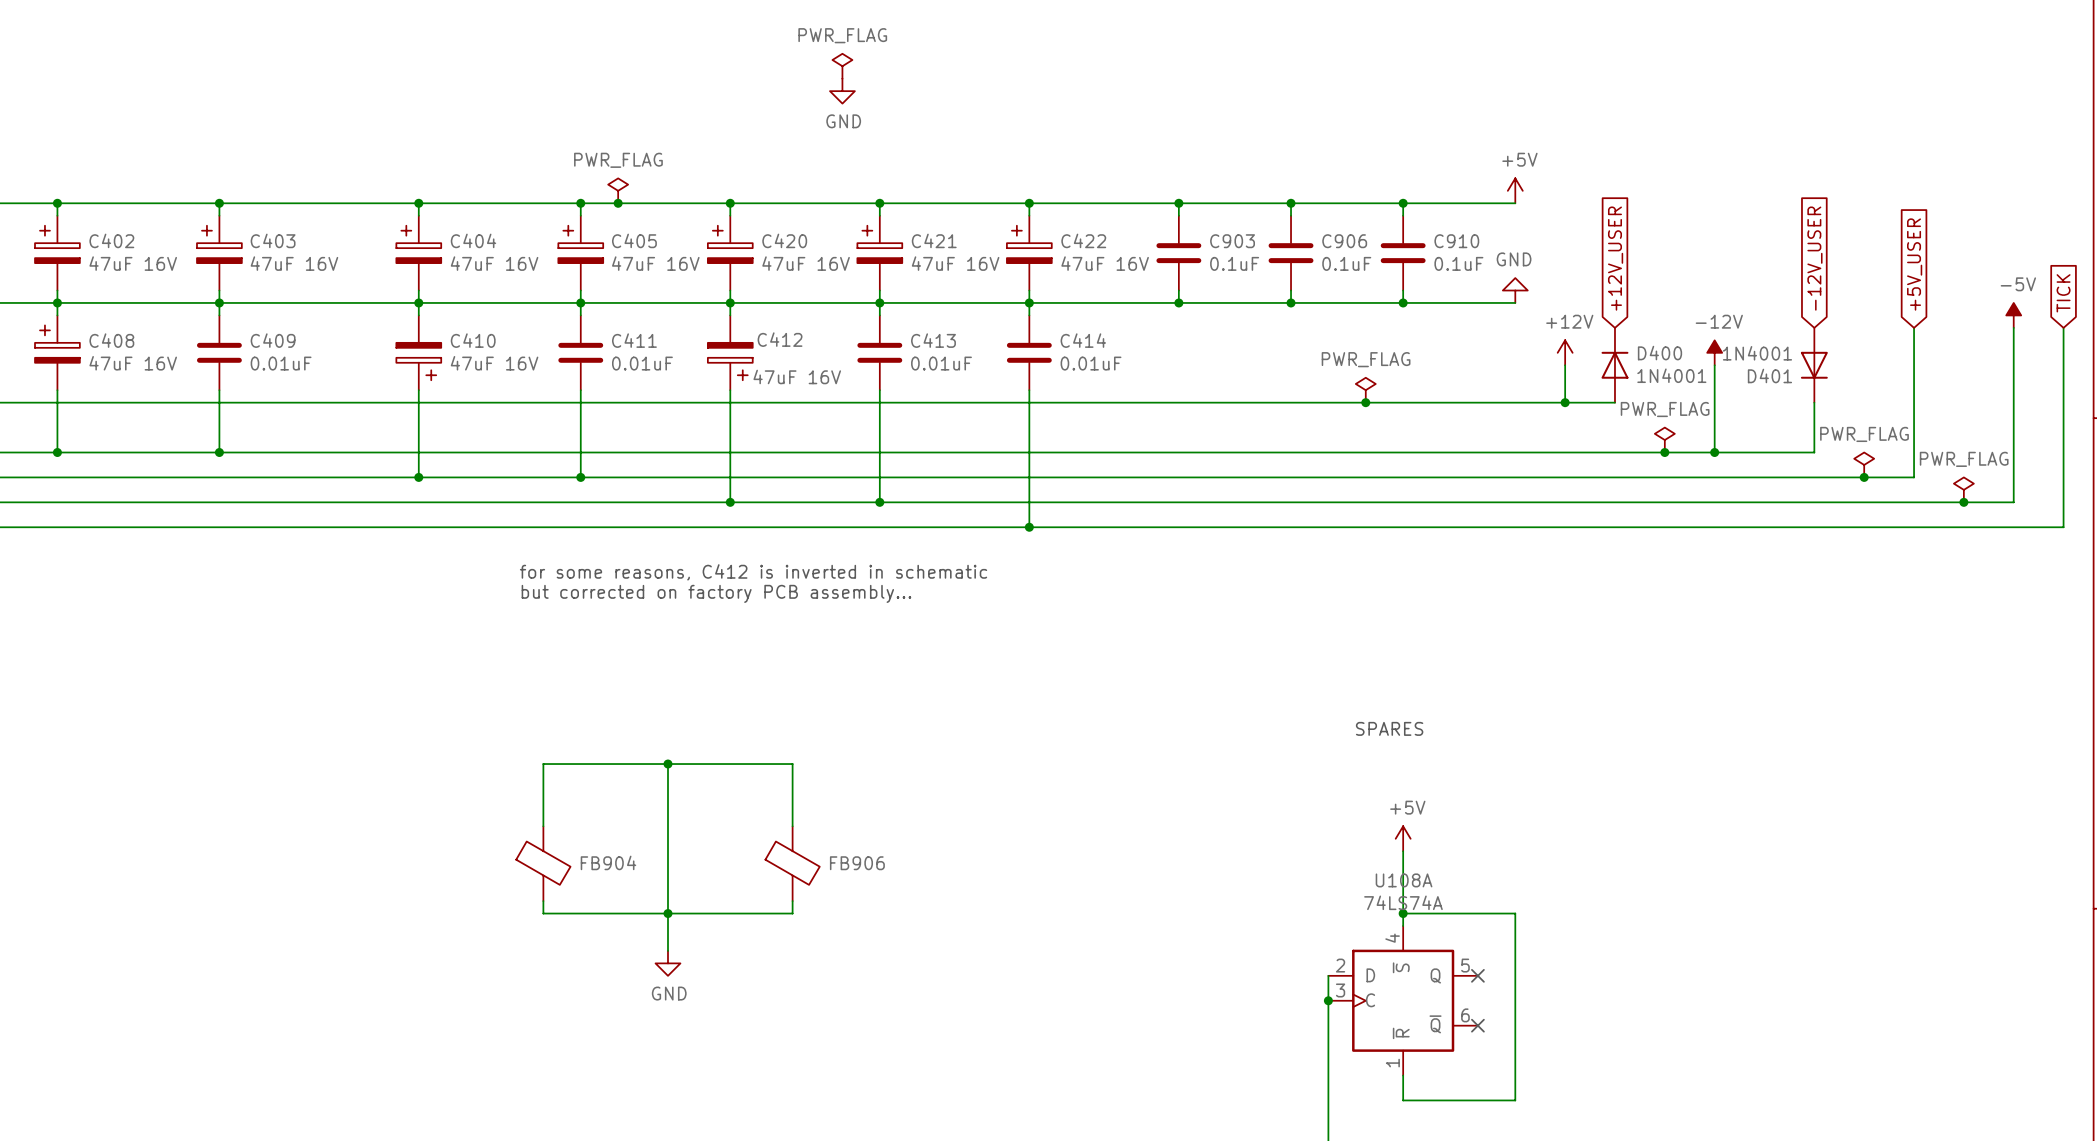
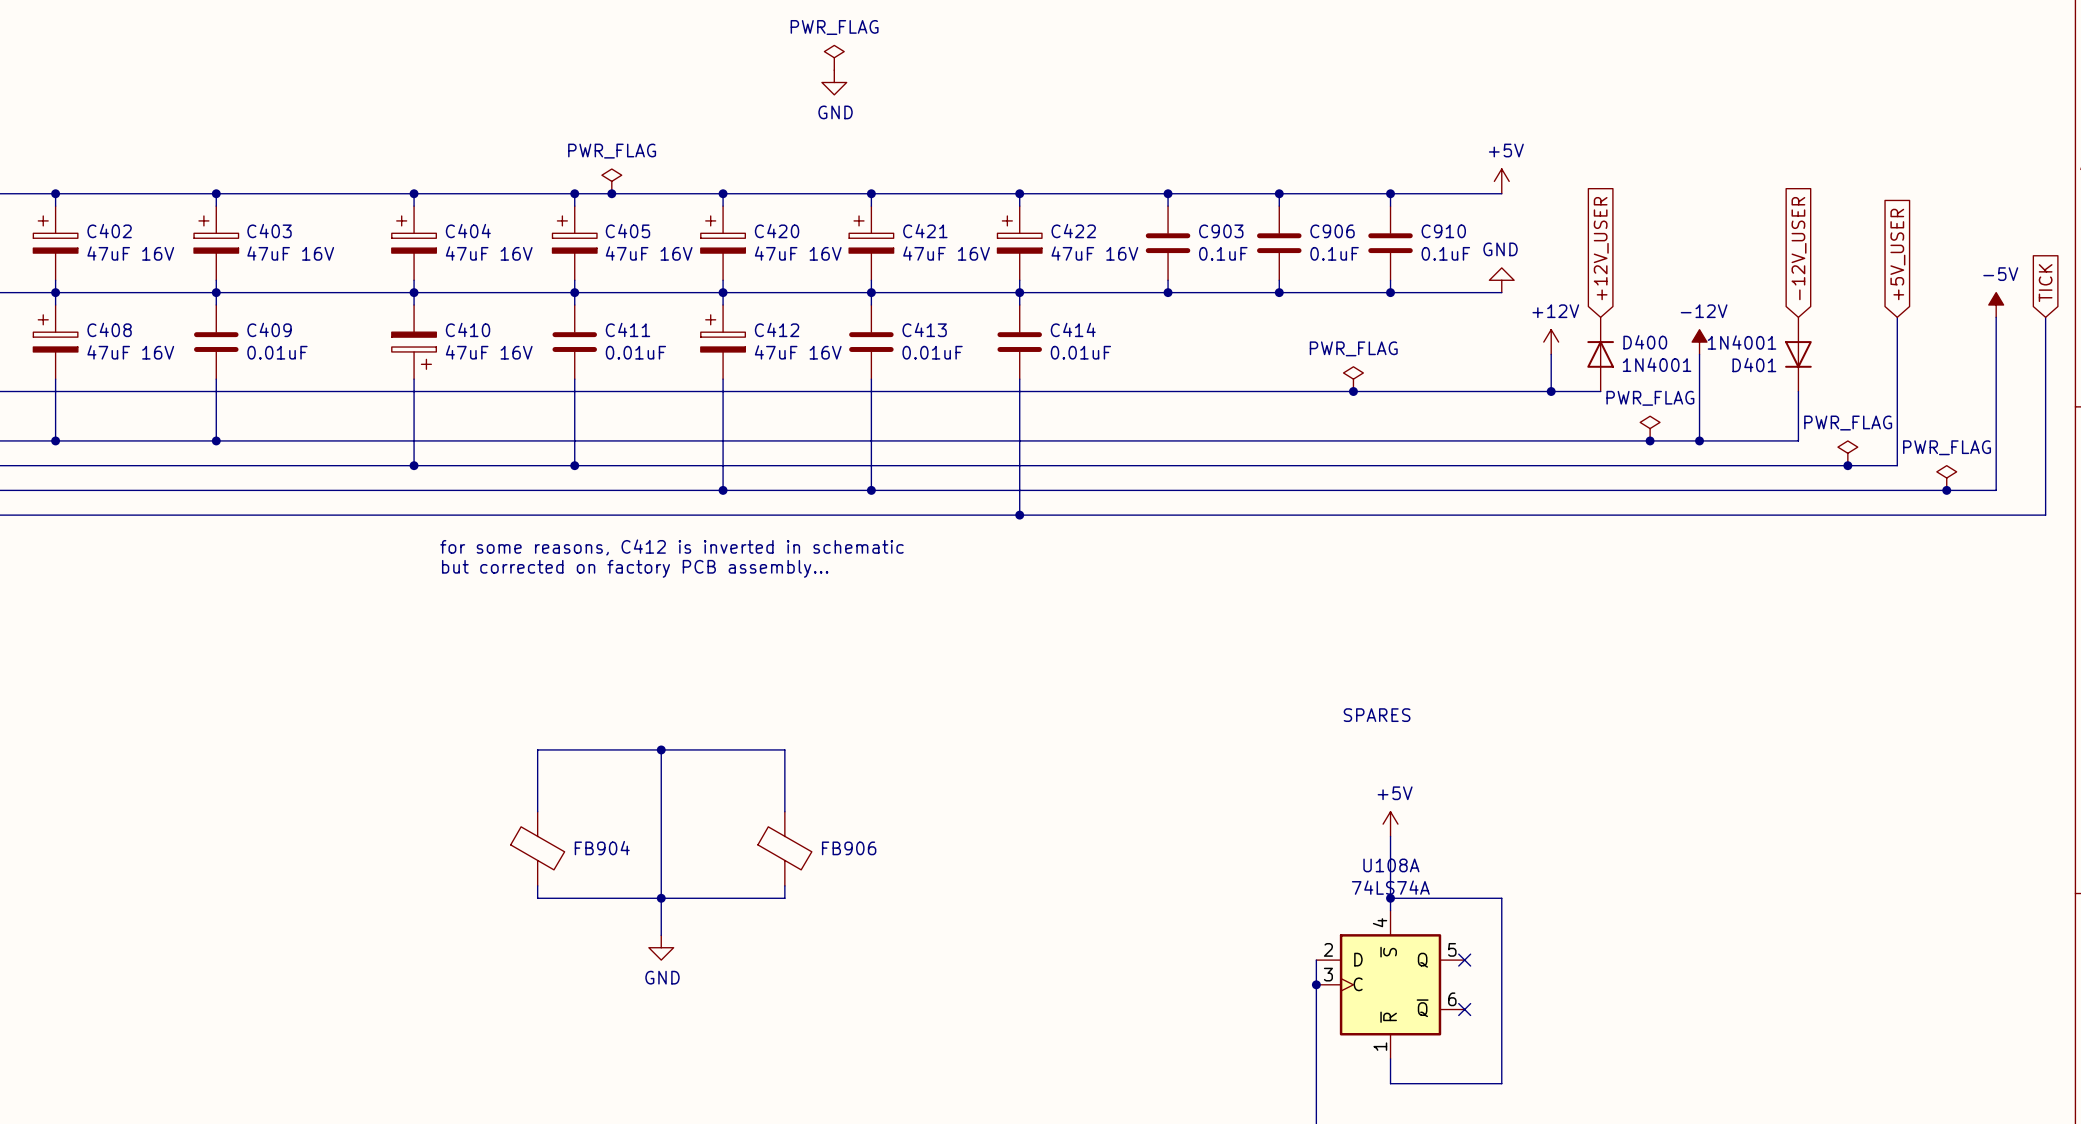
C412 rotation: 0° (730, 361) -> 180° (723, 333)
C412 value position: 47uF 16V (797, 376) -> 47uF 16V (798, 352)
text position: for some reasons, C412 is inverted in schematic (753, 572) -> for some reasons, C412 is inverted in schematic (671, 547)
text position: but corrected on factory PCB assembly… (716, 593) -> but corrected on factory PCB assembly… (635, 568)

